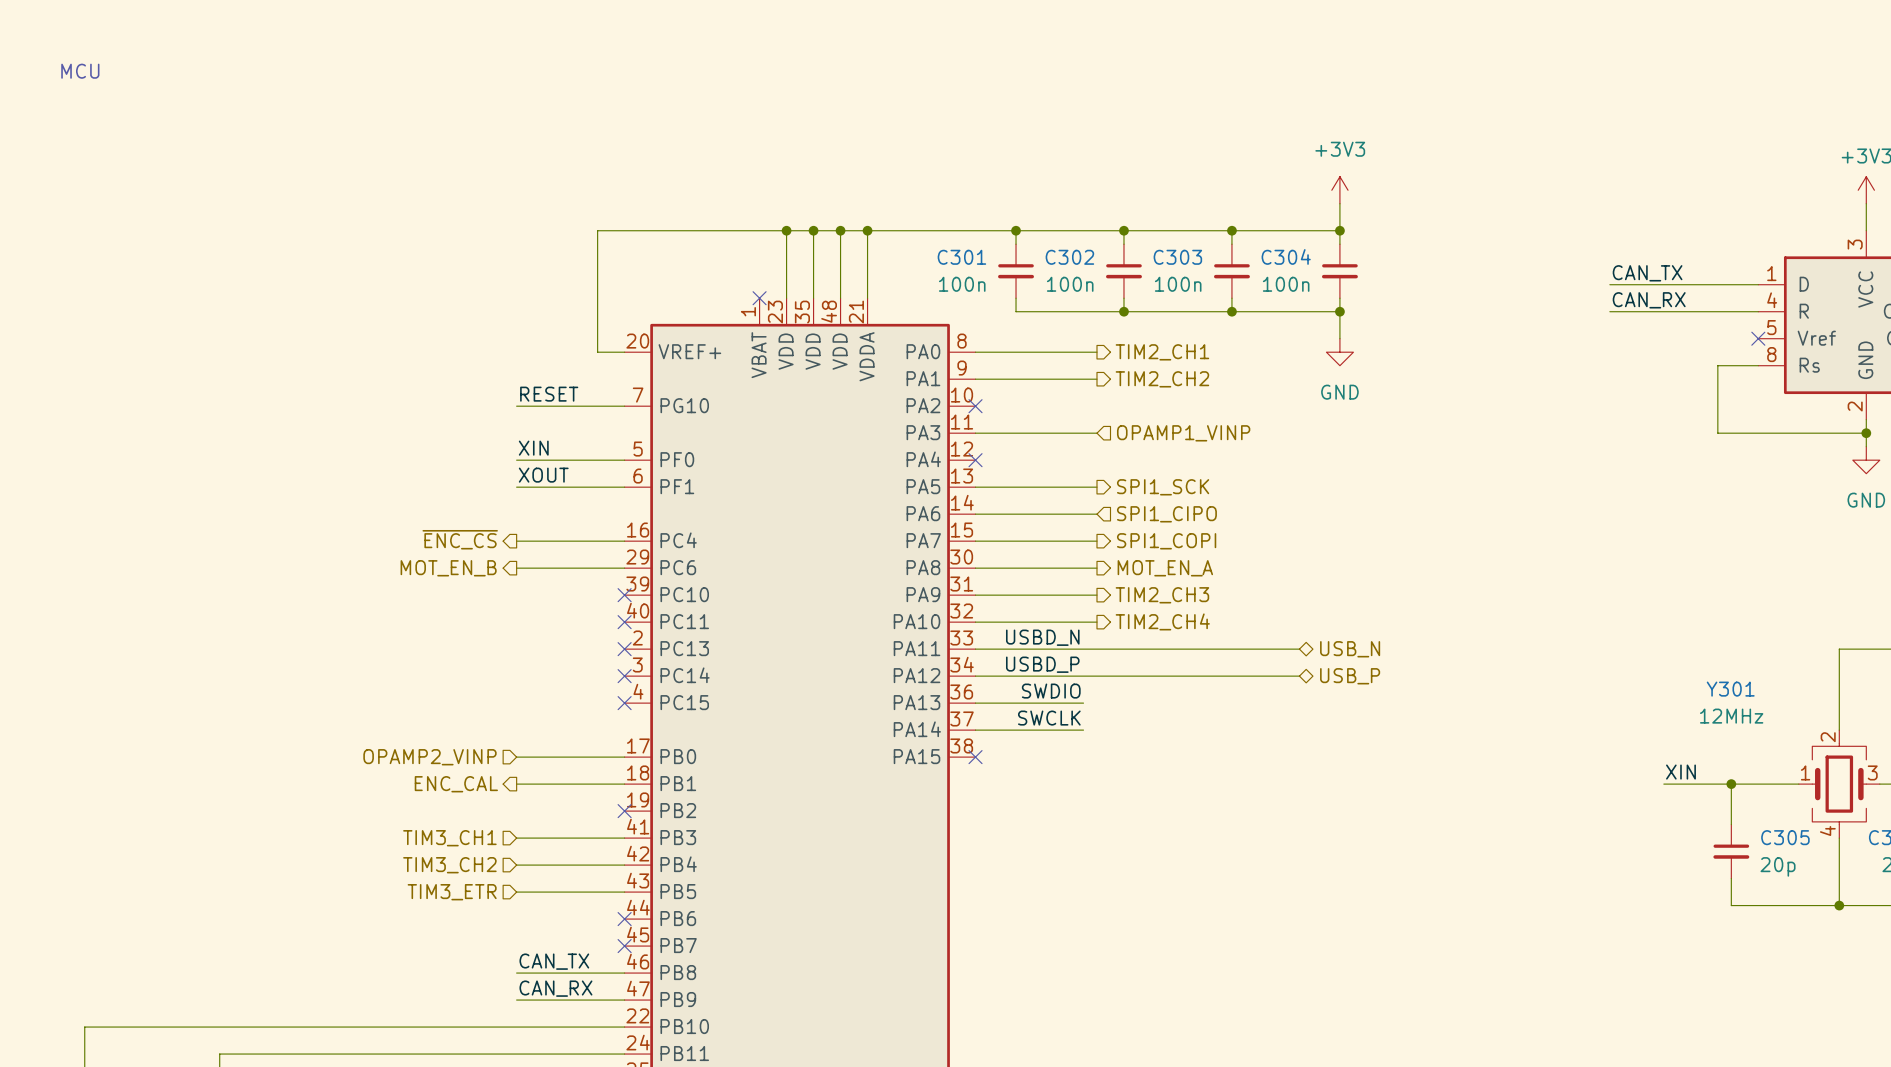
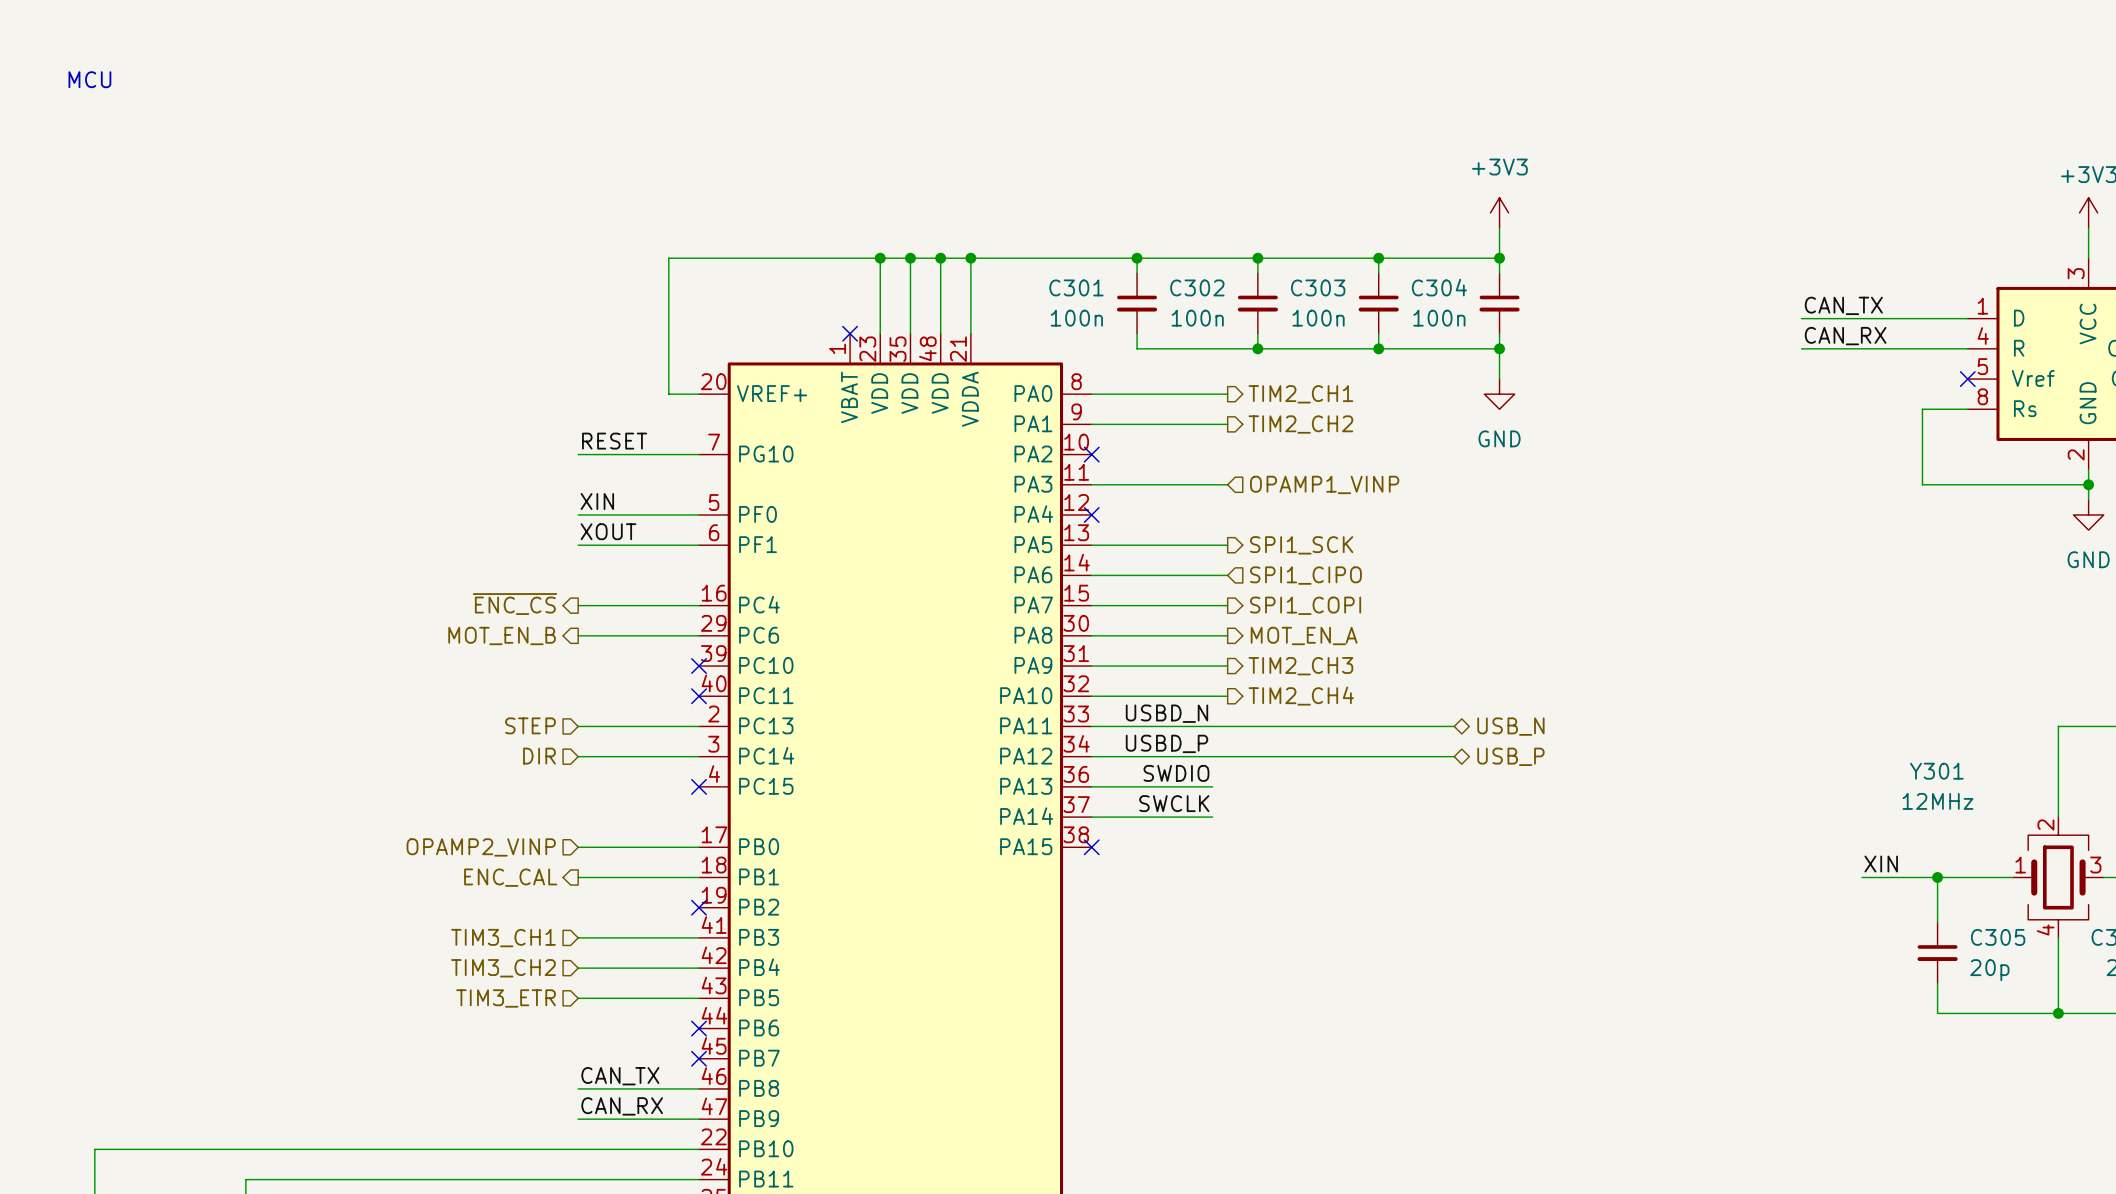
hierarchical label: none -> STEP (530, 725)
wire: none -> (578, 726) (699, 726)
no-connect mark: (624, 649) -> none
hierarchical label: none -> DIR (539, 756)
wire: none -> (578, 756) (699, 756)
no-connect mark: (624, 676) -> none

